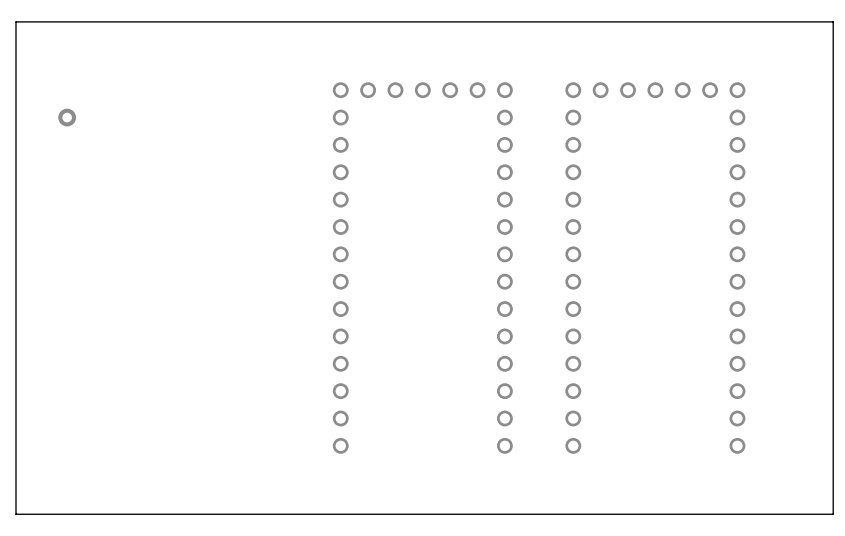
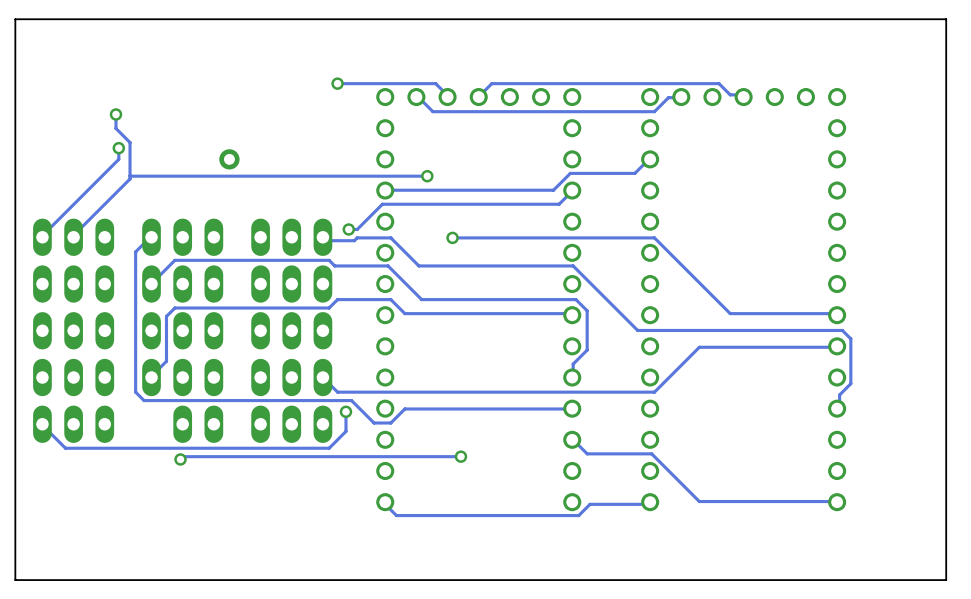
track: none -> (337, 83) (435, 83) (447, 97)
via: none -> (337, 83)
track: none -> (681, 97) (668, 97) (654, 111) (432, 111) (416, 97)
track: none -> (743, 97) (741, 94) (730, 94) (719, 83) (491, 83) (478, 97)
track: none -> (116, 114) (116, 128) (130, 142) (130, 179) (73, 237)
via: none -> (116, 114)
part position: (67, 117) -> (229, 159)
track: none -> (118, 148) (118, 159) (42, 237)
via: none -> (118, 148)
track: none -> (650, 159) (634, 173) (570, 173) (553, 190) (385, 190)
track: none -> (427, 176) (130, 176)
via: none -> (427, 176)
track: none -> (572, 190) (559, 204) (382, 204) (357, 229) (348, 229)
via: none -> (348, 229)
part: none -> (73, 237)
track: none -> (151, 237) (135, 251) (135, 392) (144, 400) (351, 400) (374, 423) (390, 423) (404, 408) (572, 408)
part: none -> (182, 237)
part: none -> (291, 237)
track: none -> (322, 237) (326, 240) (390, 237) (418, 265) (573, 265) (637, 330) (842, 330) (850, 338) (850, 383) (839, 394) (839, 406) (837, 408)
track: none -> (452, 237) (654, 237) (730, 313) (836, 313) (837, 315)
via: none -> (452, 237)
part: none -> (73, 284)
track: none -> (151, 284) (174, 260) (329, 260) (334, 265) (388, 265) (421, 299) (575, 299) (587, 310) (587, 350) (573, 364) (572, 377)
part: none -> (182, 284)
part: none -> (291, 284)
track: none -> (572, 315) (570, 313) (404, 313) (390, 299) (337, 299) (329, 308) (174, 308) (166, 316) (166, 361) (151, 377)
part: none -> (73, 330)
part: none -> (182, 330)
part: none -> (291, 330)
track: none -> (837, 346) (699, 347) (654, 392) (337, 392) (322, 377)
part: none -> (73, 377)
part: none -> (182, 377)
part: none -> (291, 377)
track: none -> (345, 411) (345, 431) (329, 448) (65, 448) (42, 424)
via: none -> (345, 411)
part: none -> (73, 424)
part: none -> (198, 424)
part: none -> (291, 424)
track: none -> (572, 439) (587, 453) (651, 453) (699, 501) (837, 502)
track: none -> (460, 456) (183, 456) (180, 459)
via: none -> (460, 456)
via: none -> (180, 459)
track: none -> (650, 502) (648, 504) (589, 504) (578, 515) (396, 515) (385, 502)

